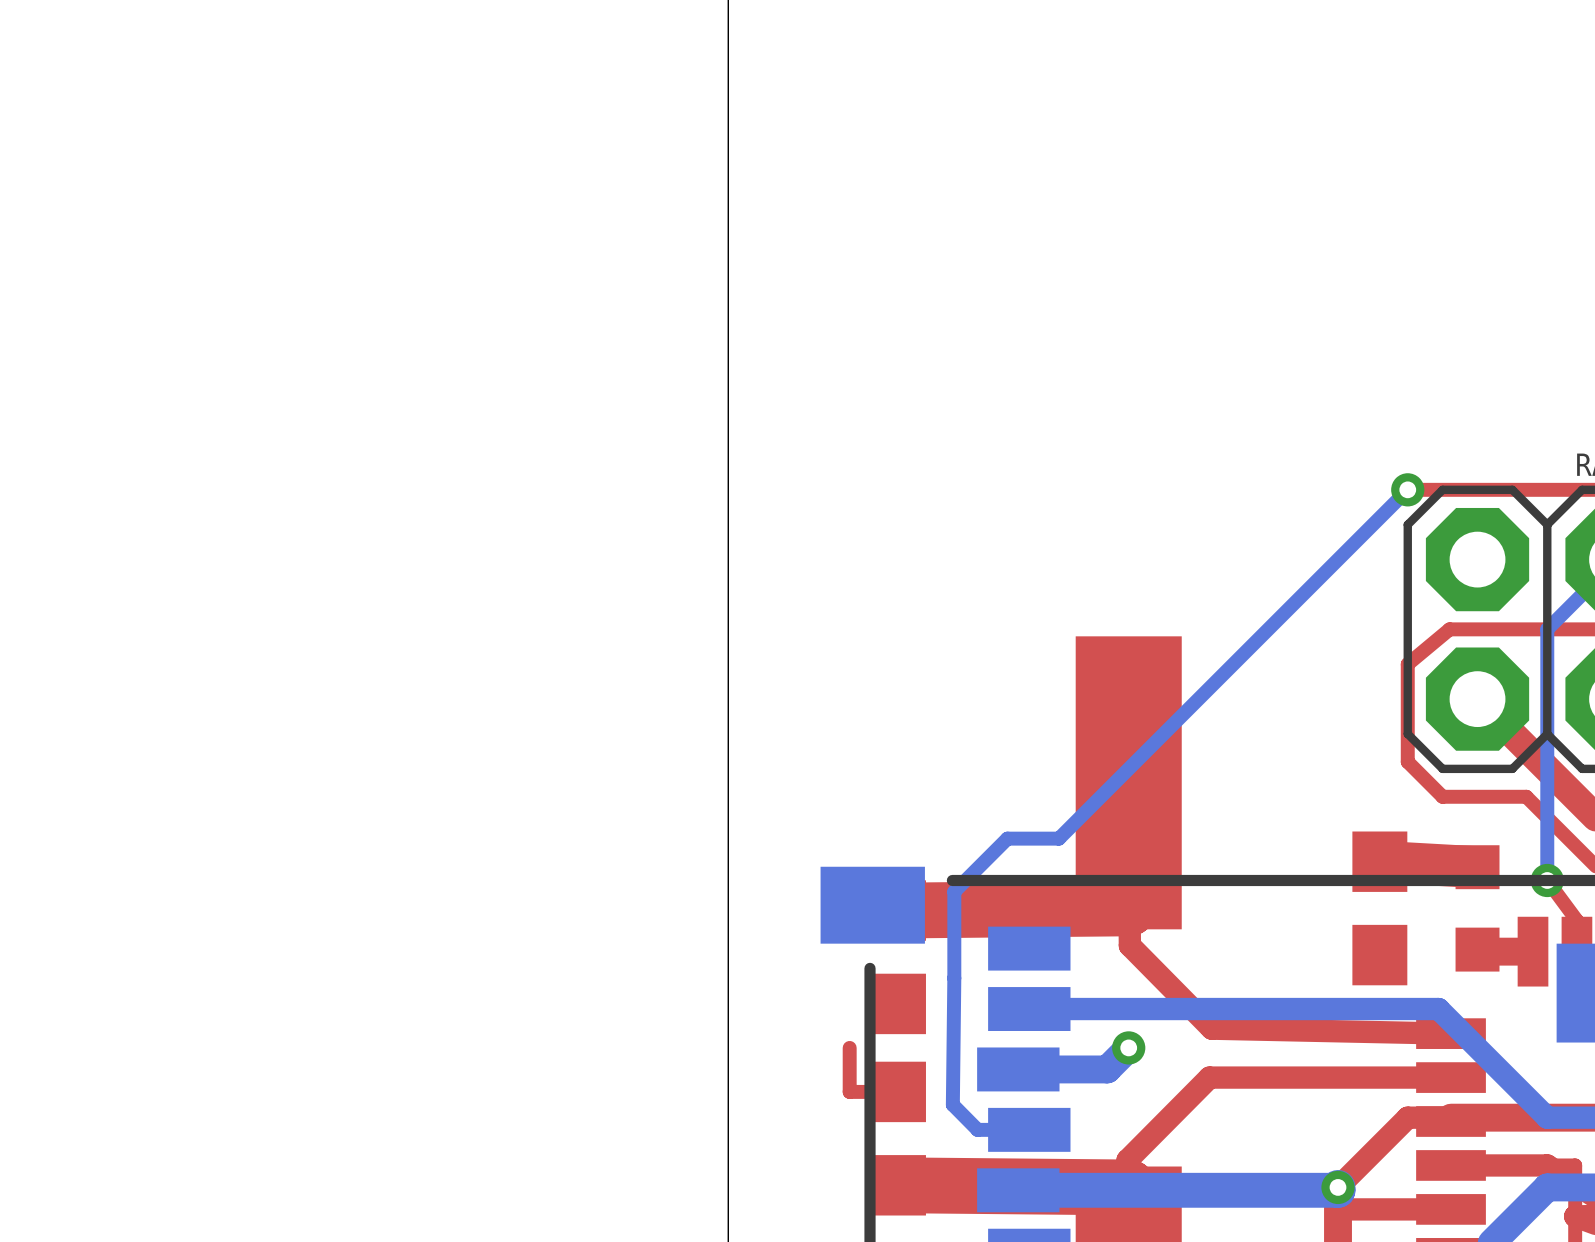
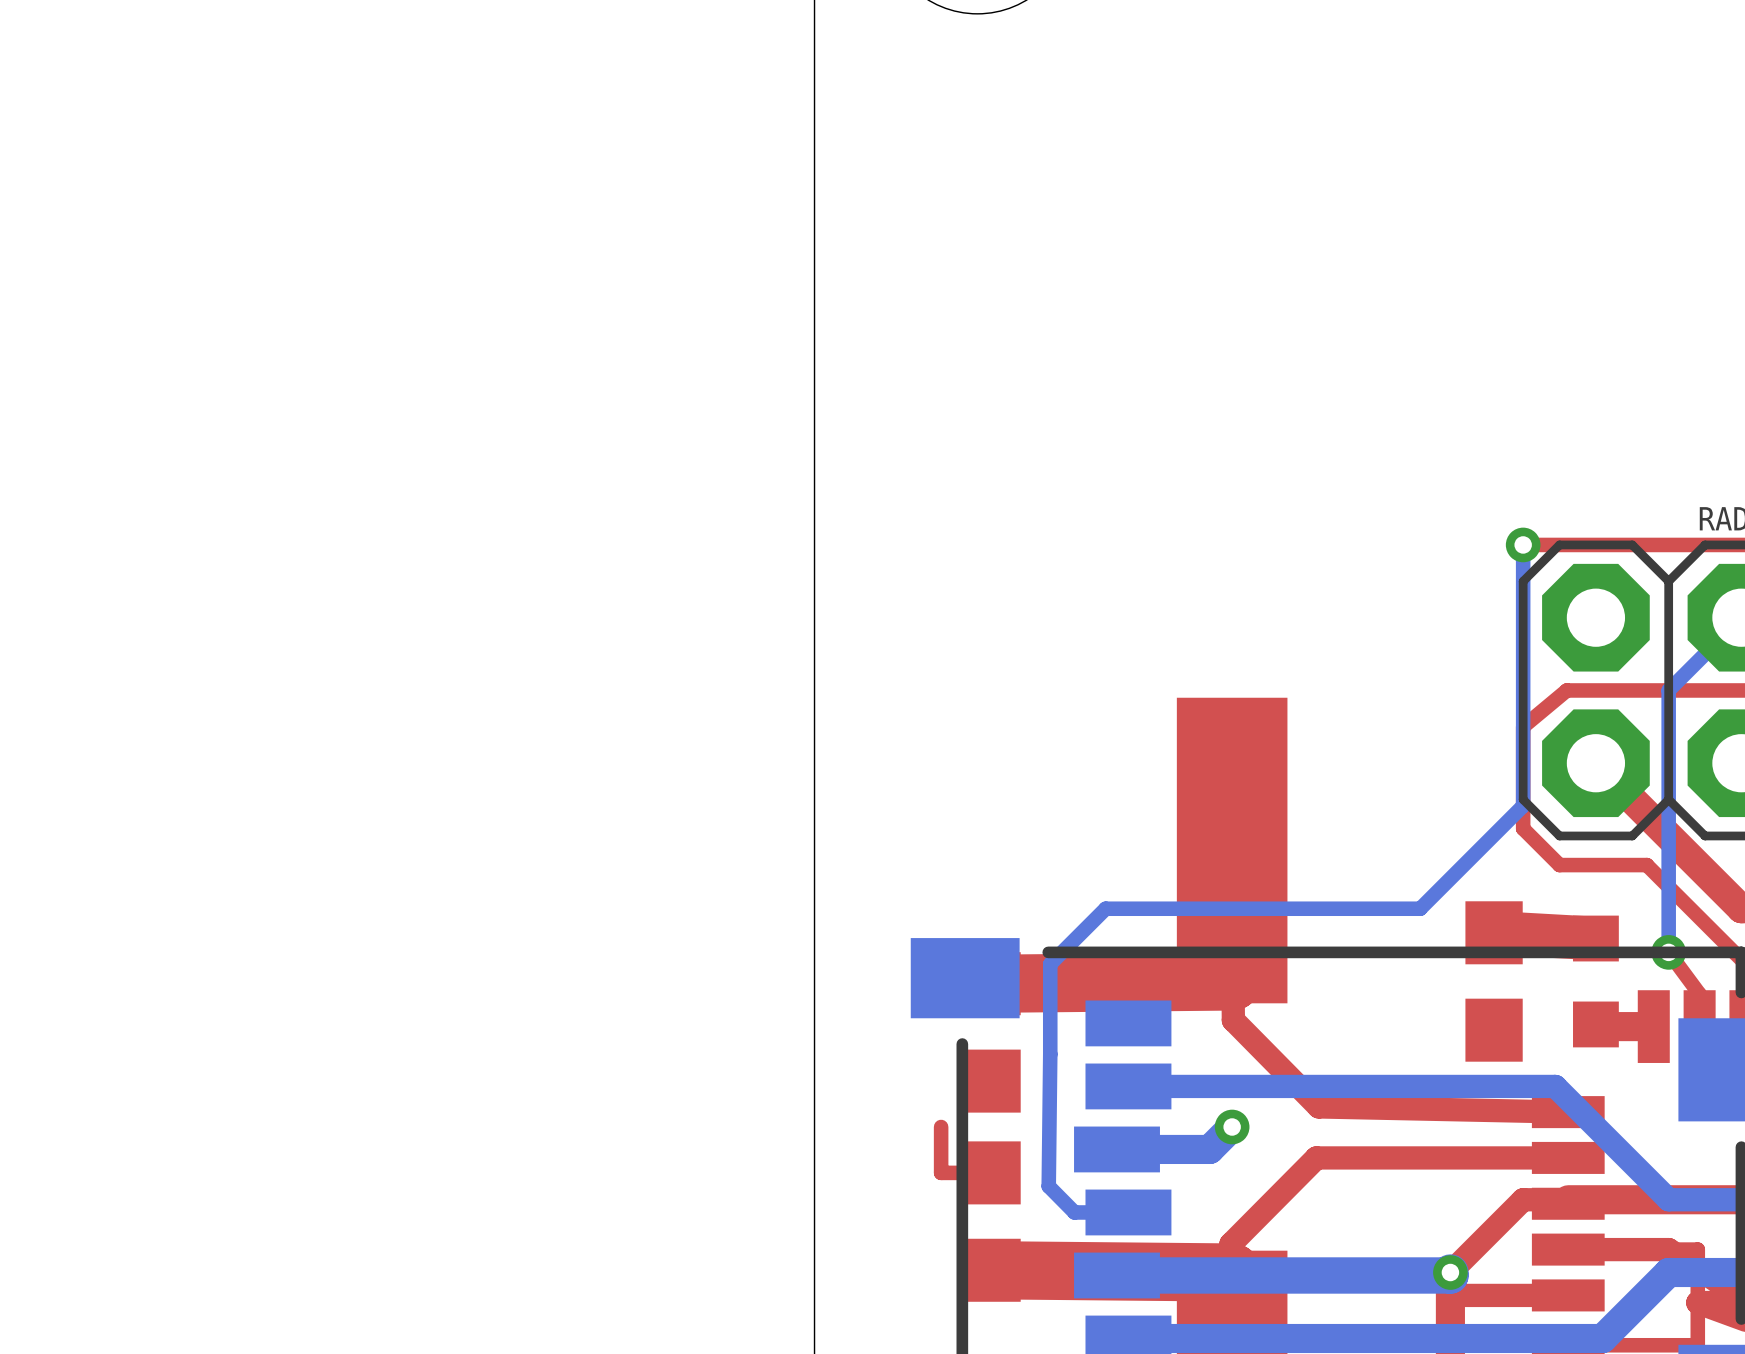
bottom track: (1407, 489) (1058, 838) -> (1523, 544) (1523, 805) (1420, 908) (1159, 908)

